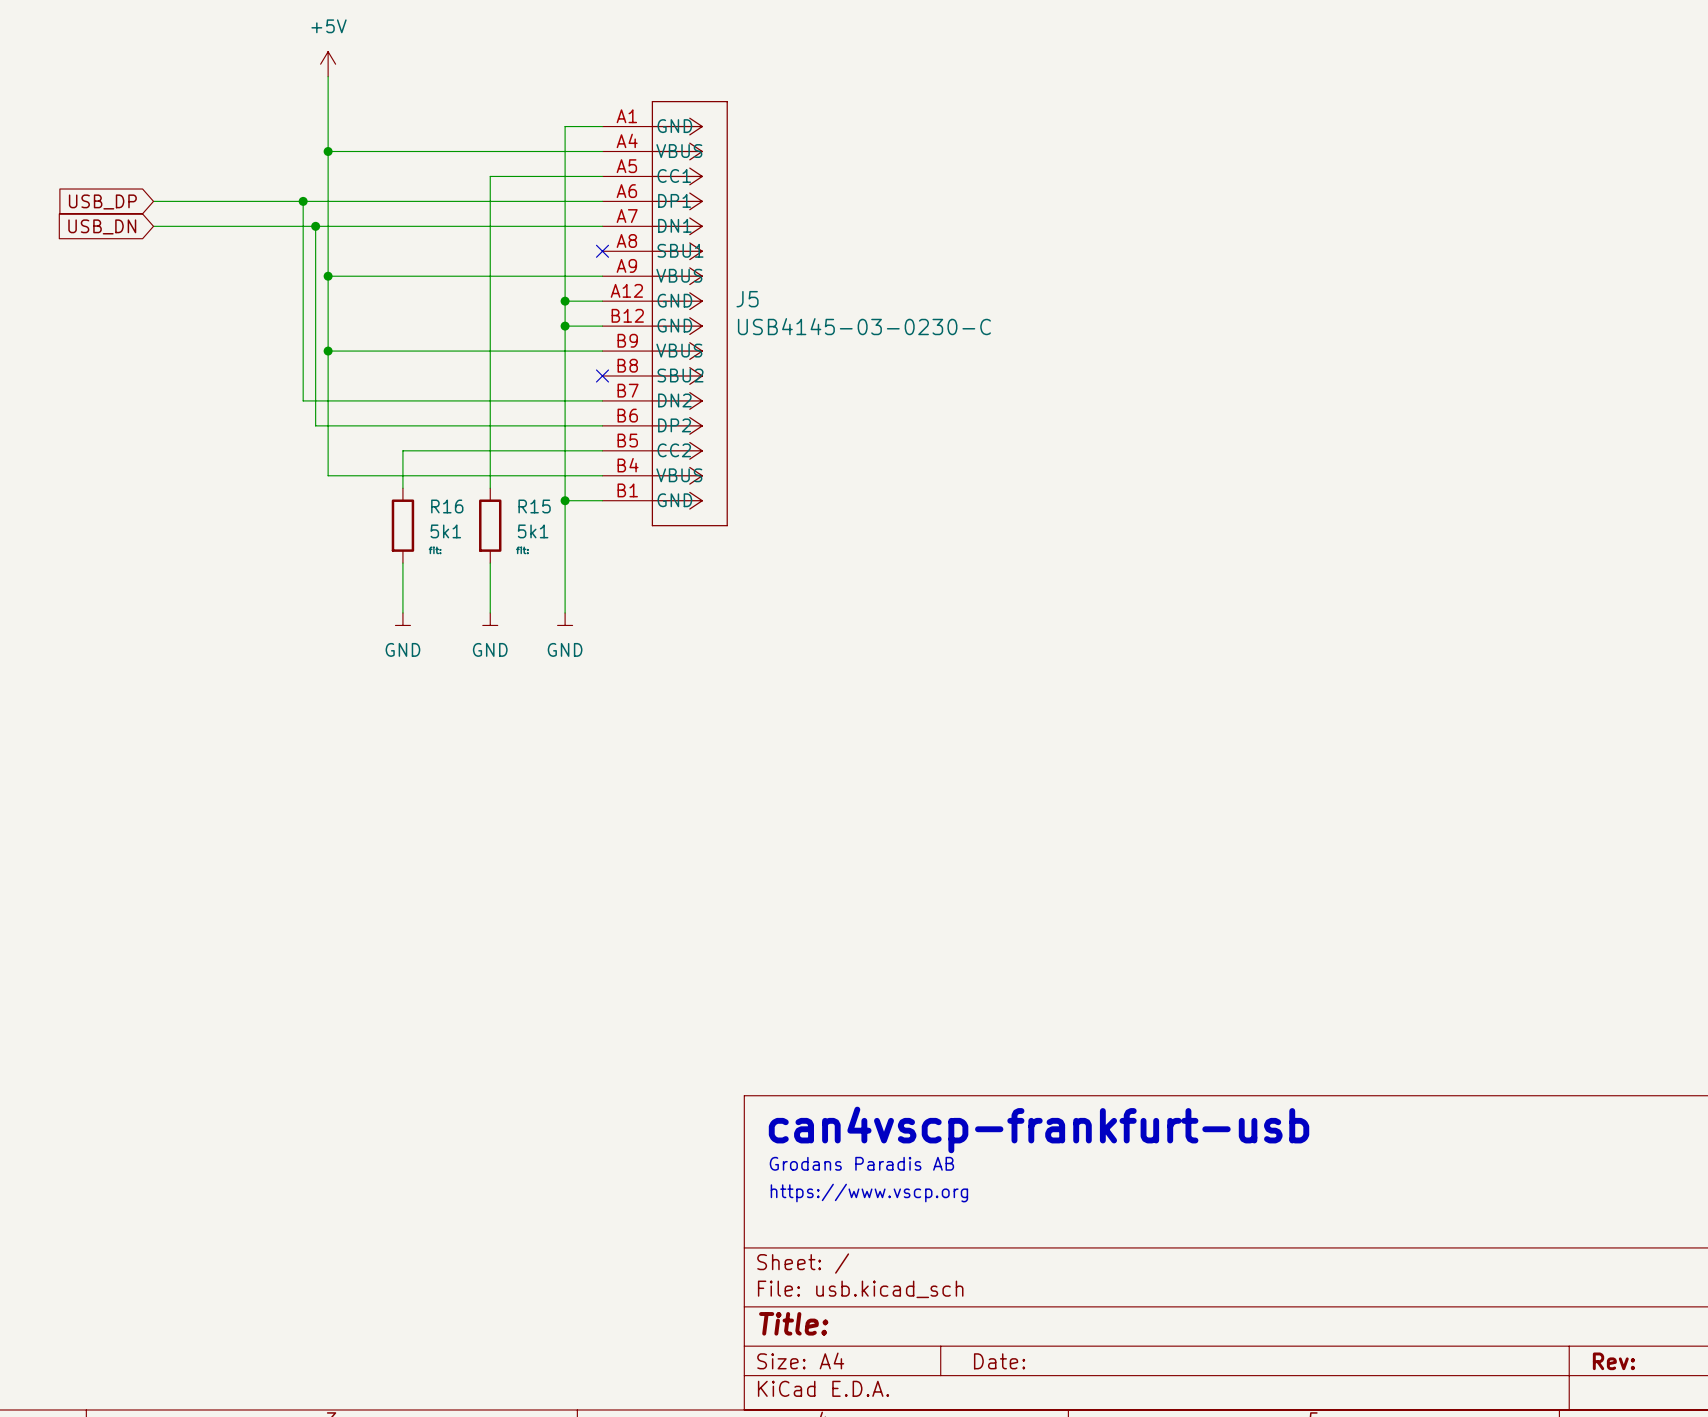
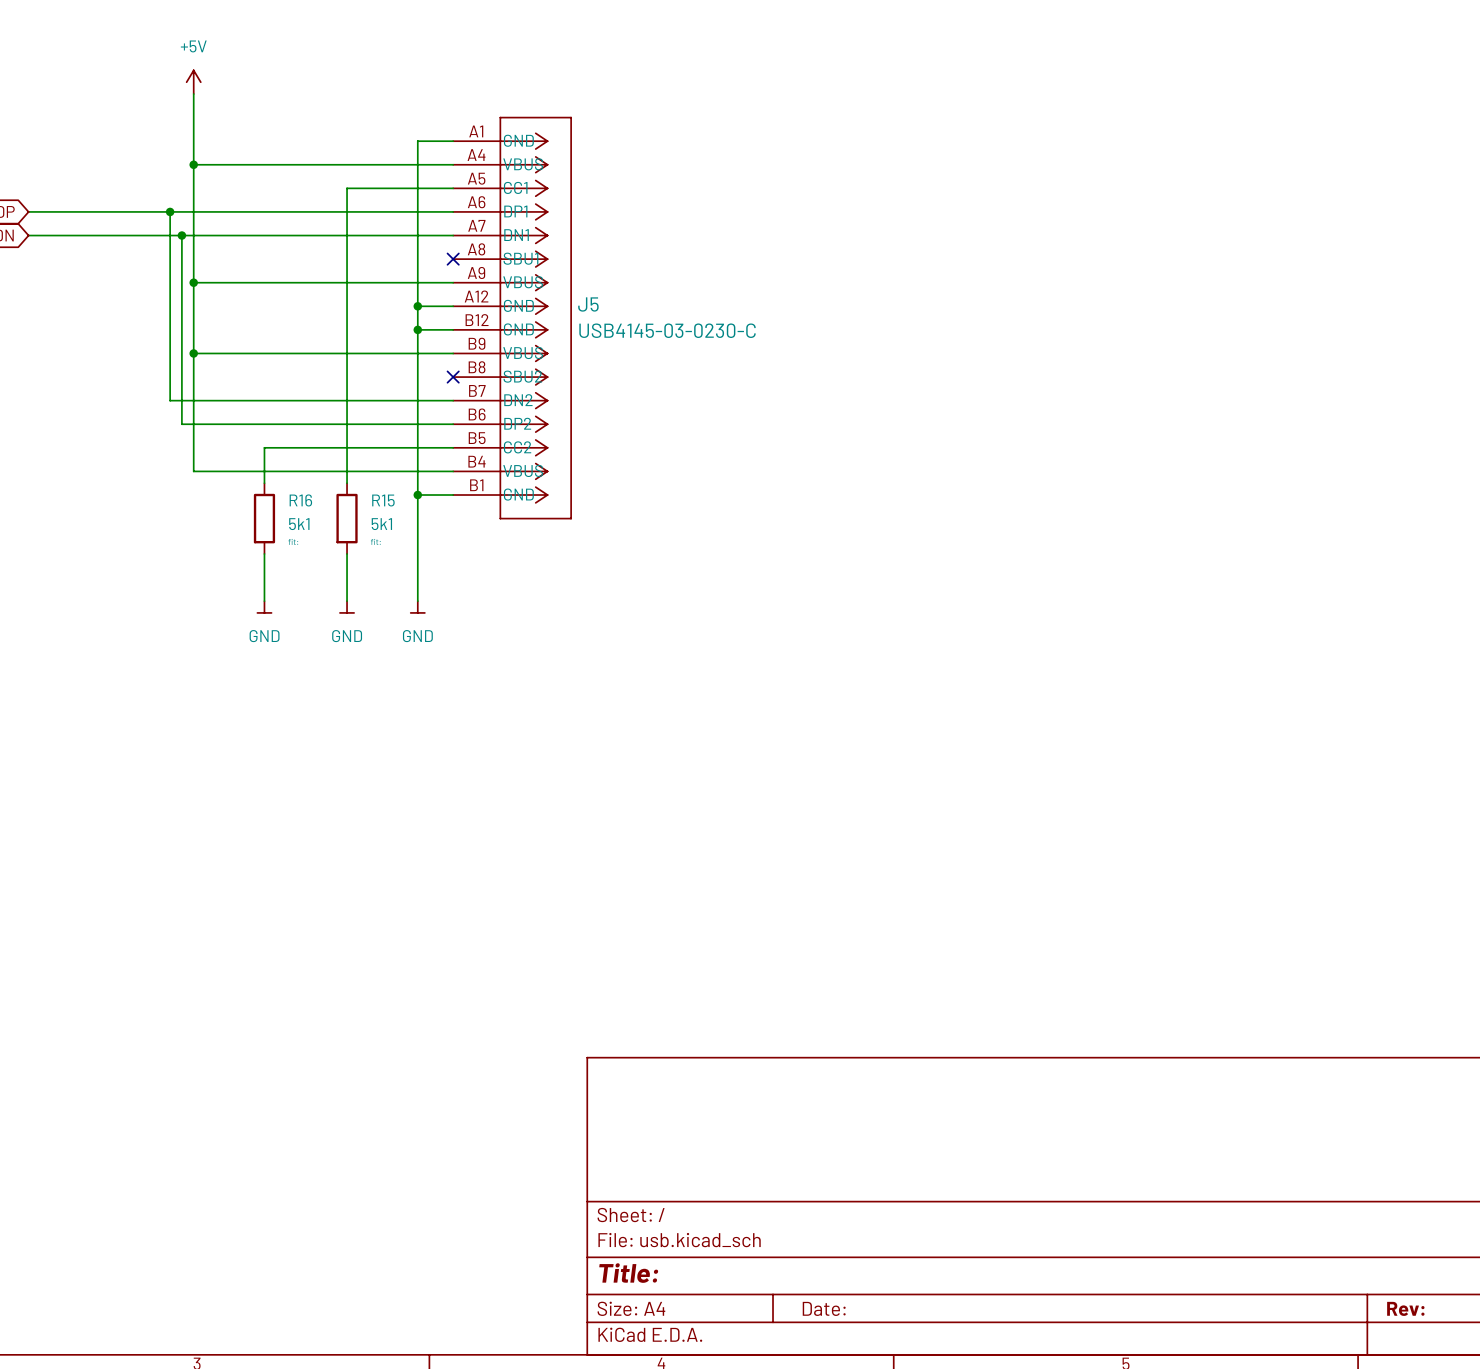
text: can4vscp-frankfurt-usb (1039, 1129) -> none
text: Grodans Paradis AB (861, 1163) -> none
text: https://www.vscp.org (869, 1193) -> none

